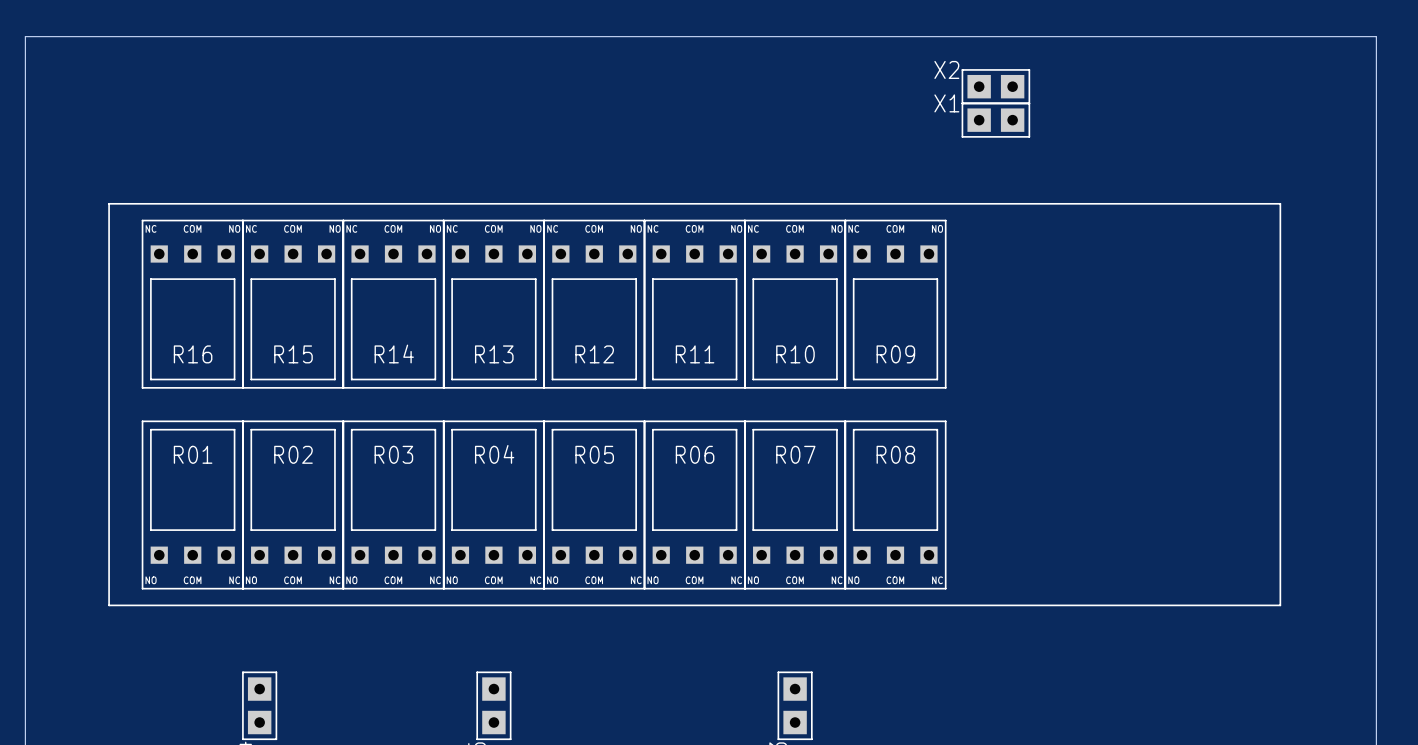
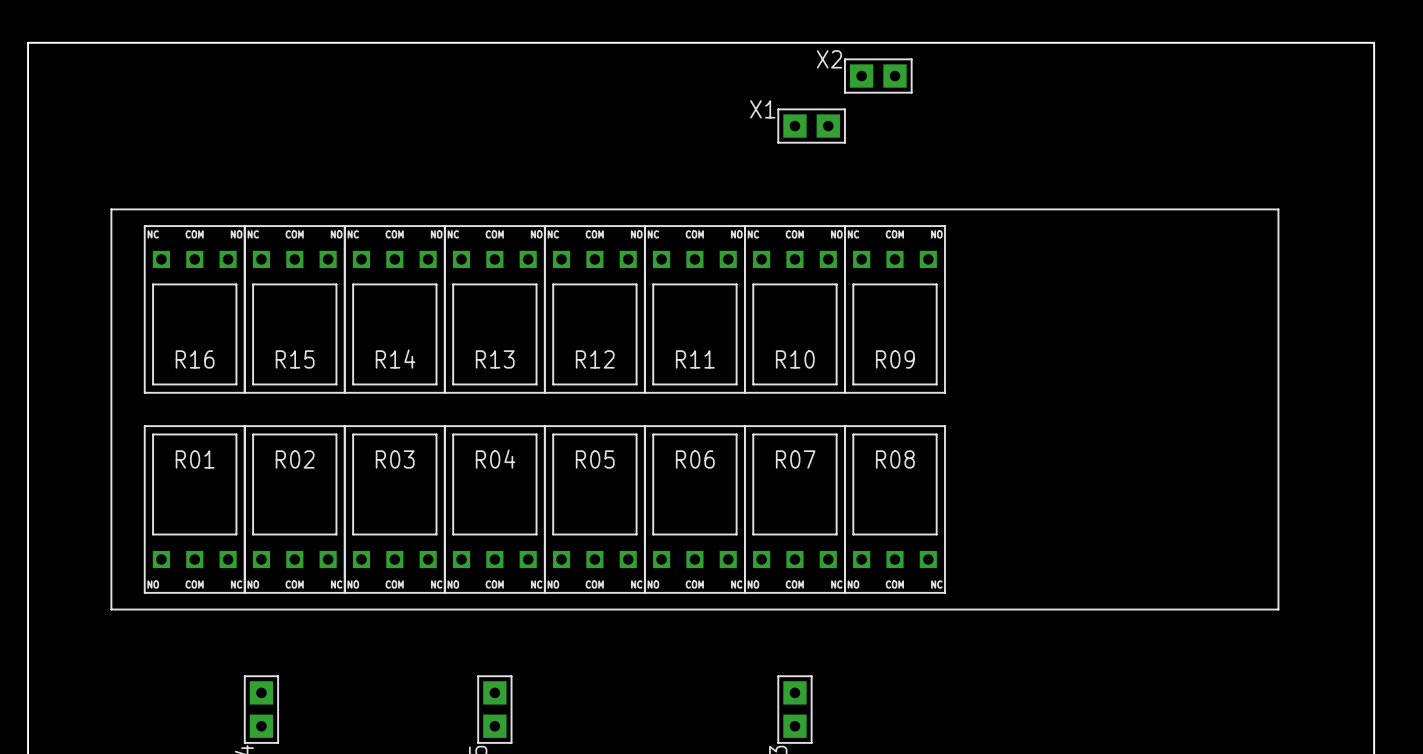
X2 position: (995, 86) -> (878, 76)
X1 position: (995, 120) -> (811, 126)

